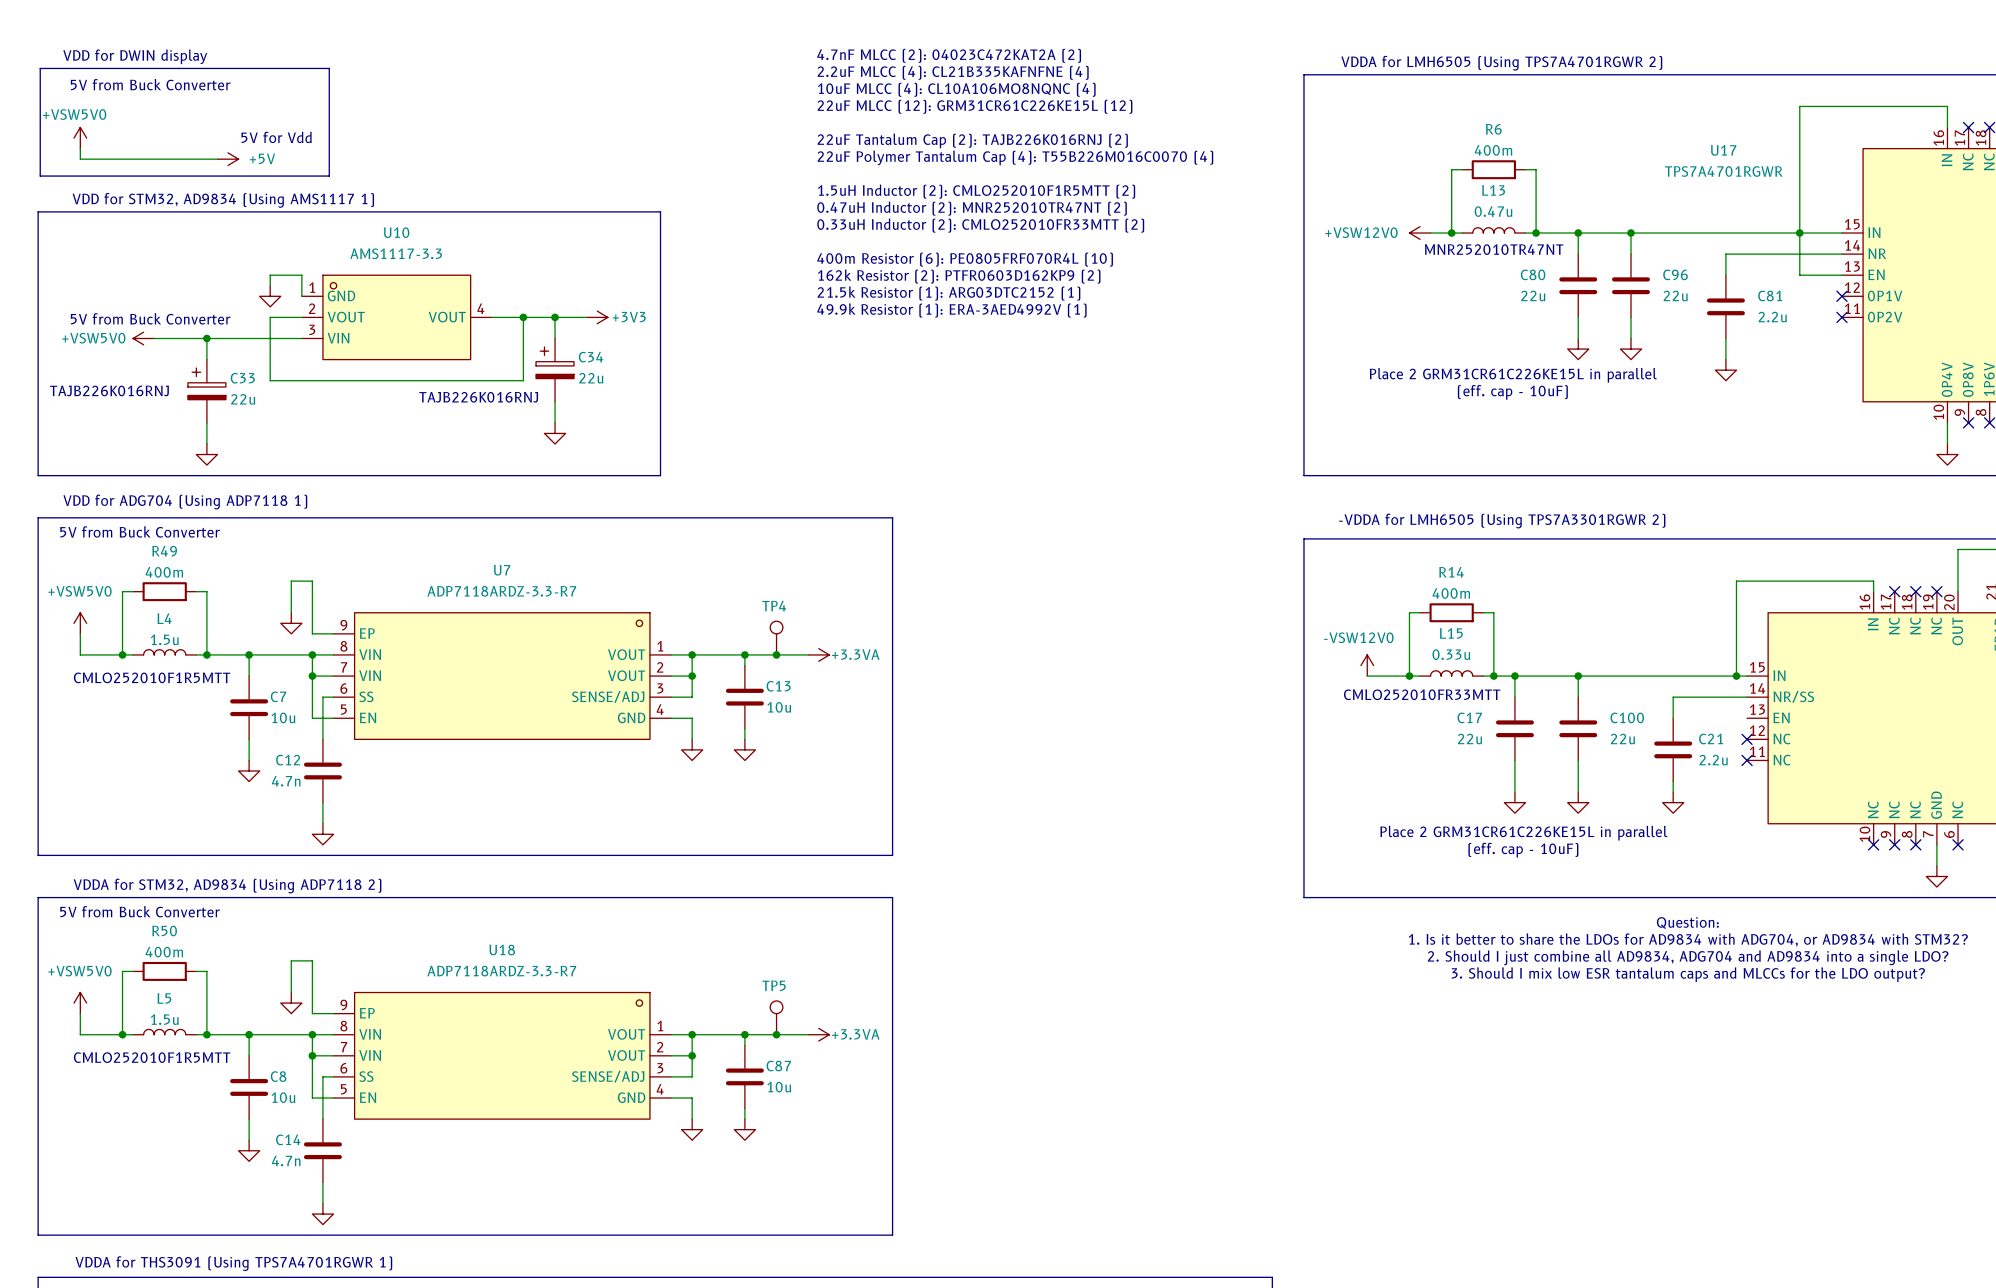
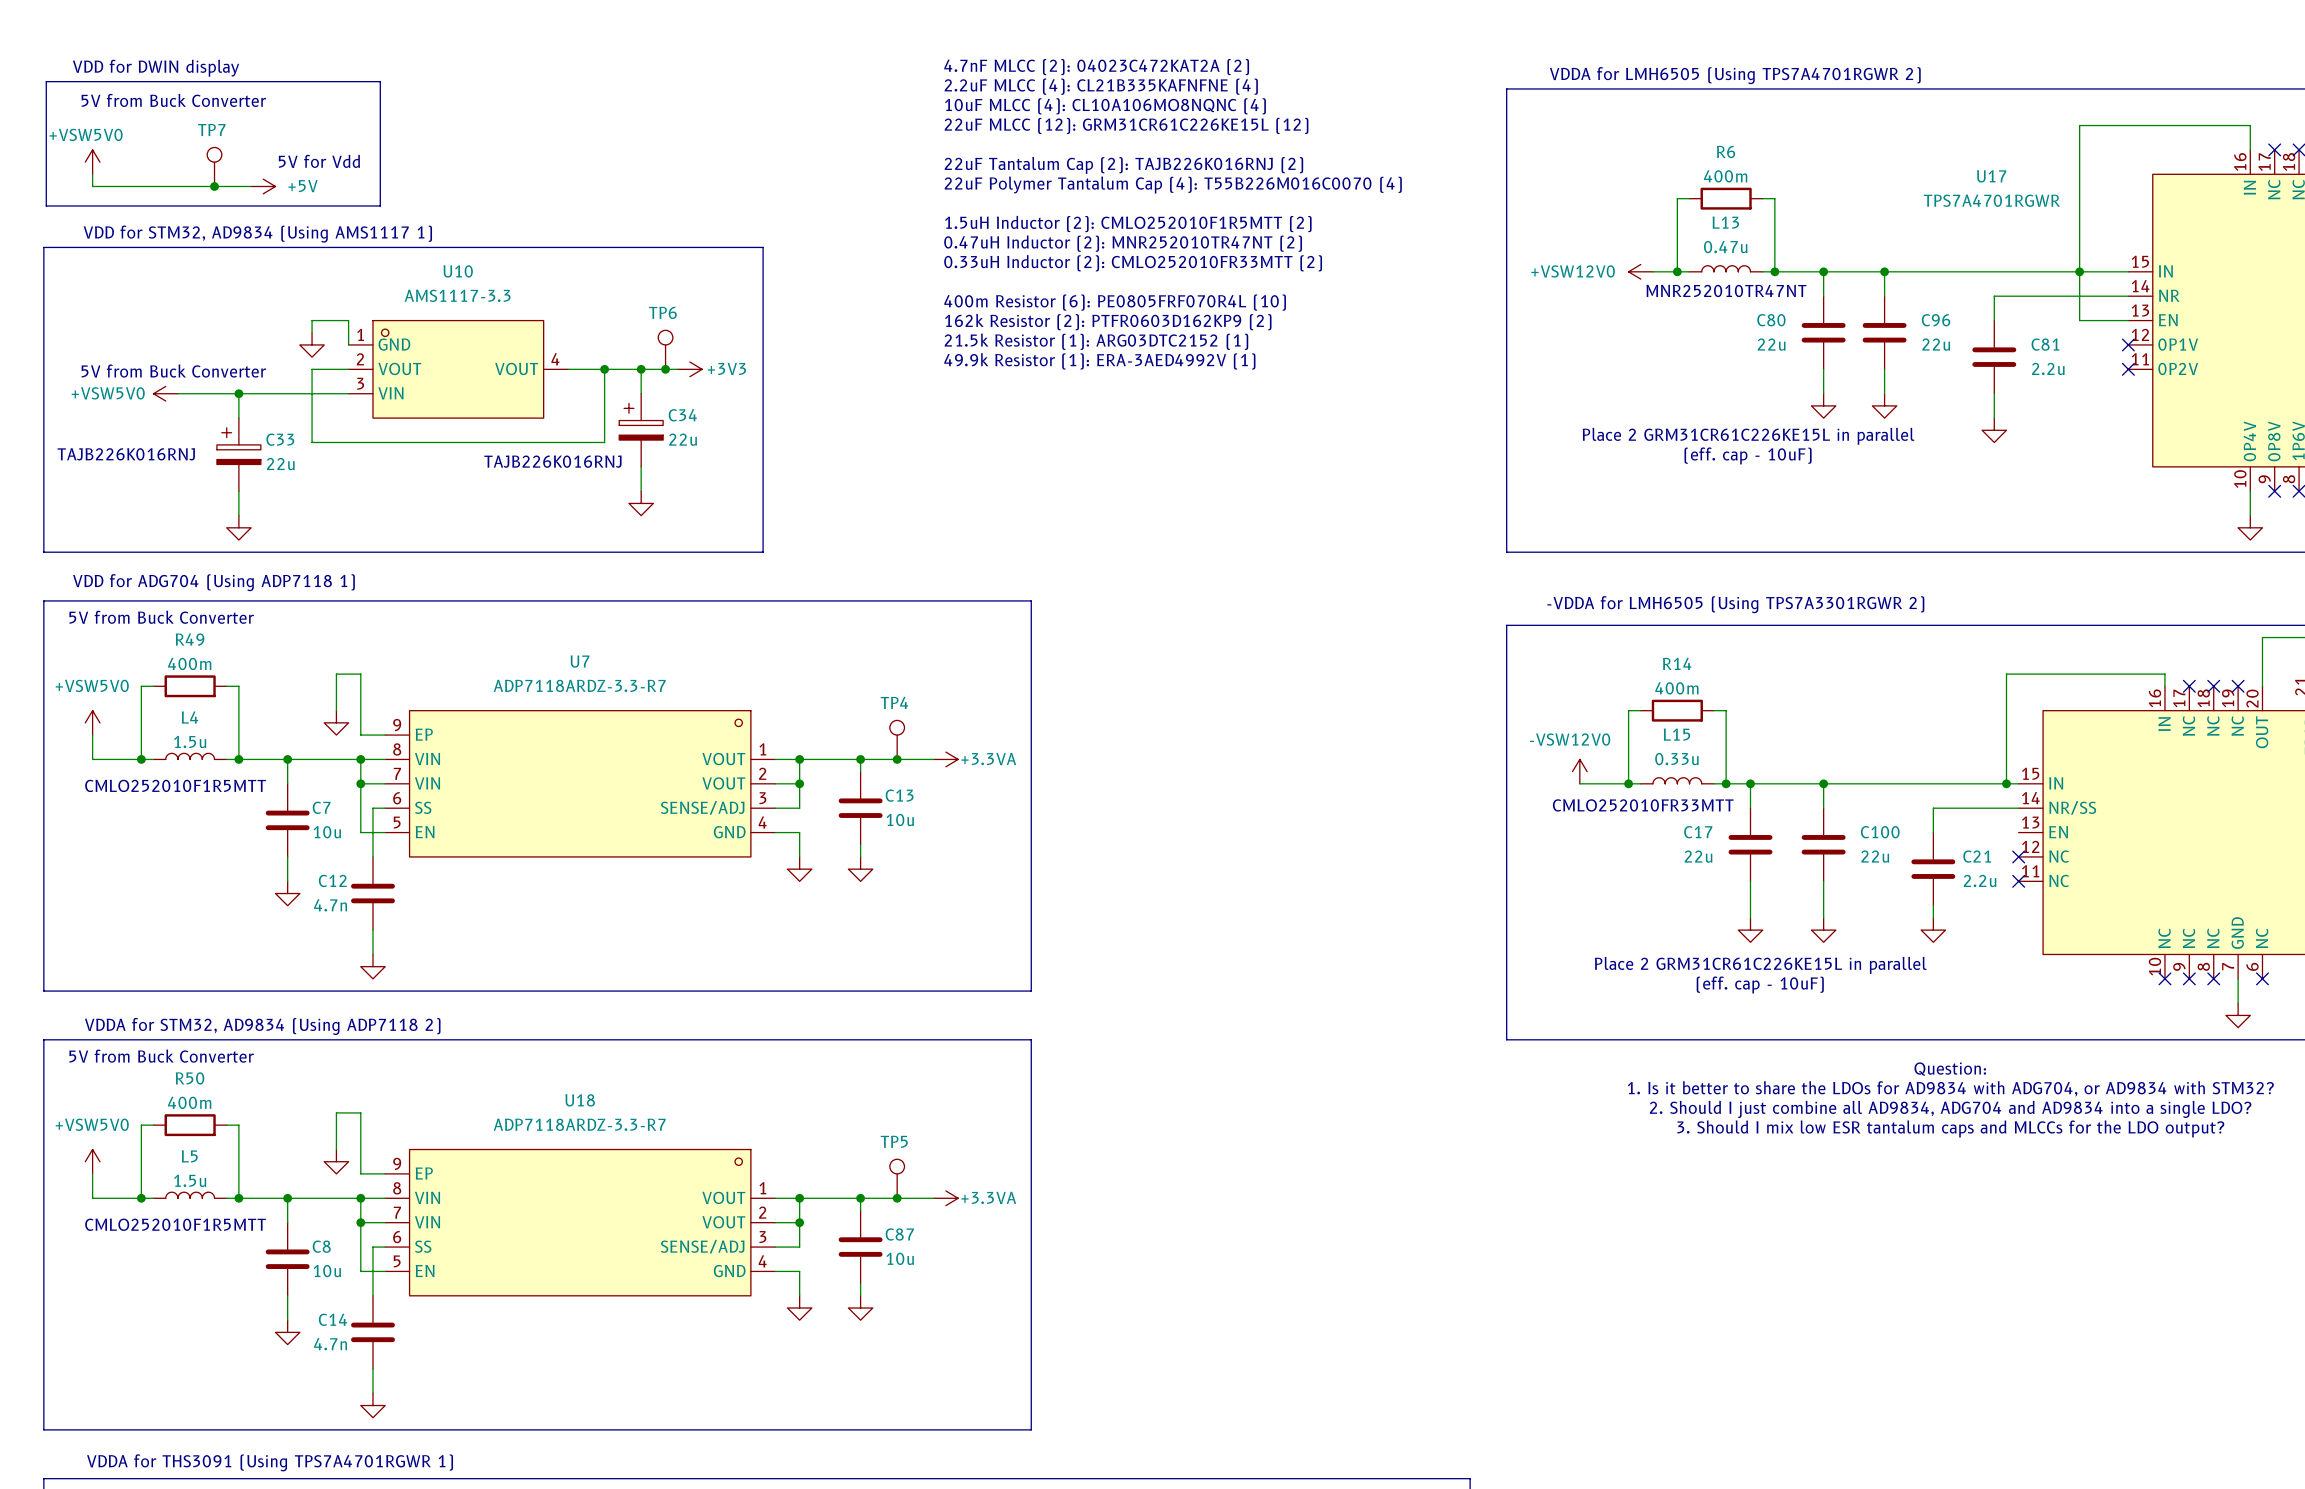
TP7: none -> (214, 166)
junction: none -> (214, 186)
TP6: none -> (665, 349)
junction: none -> (665, 369)

